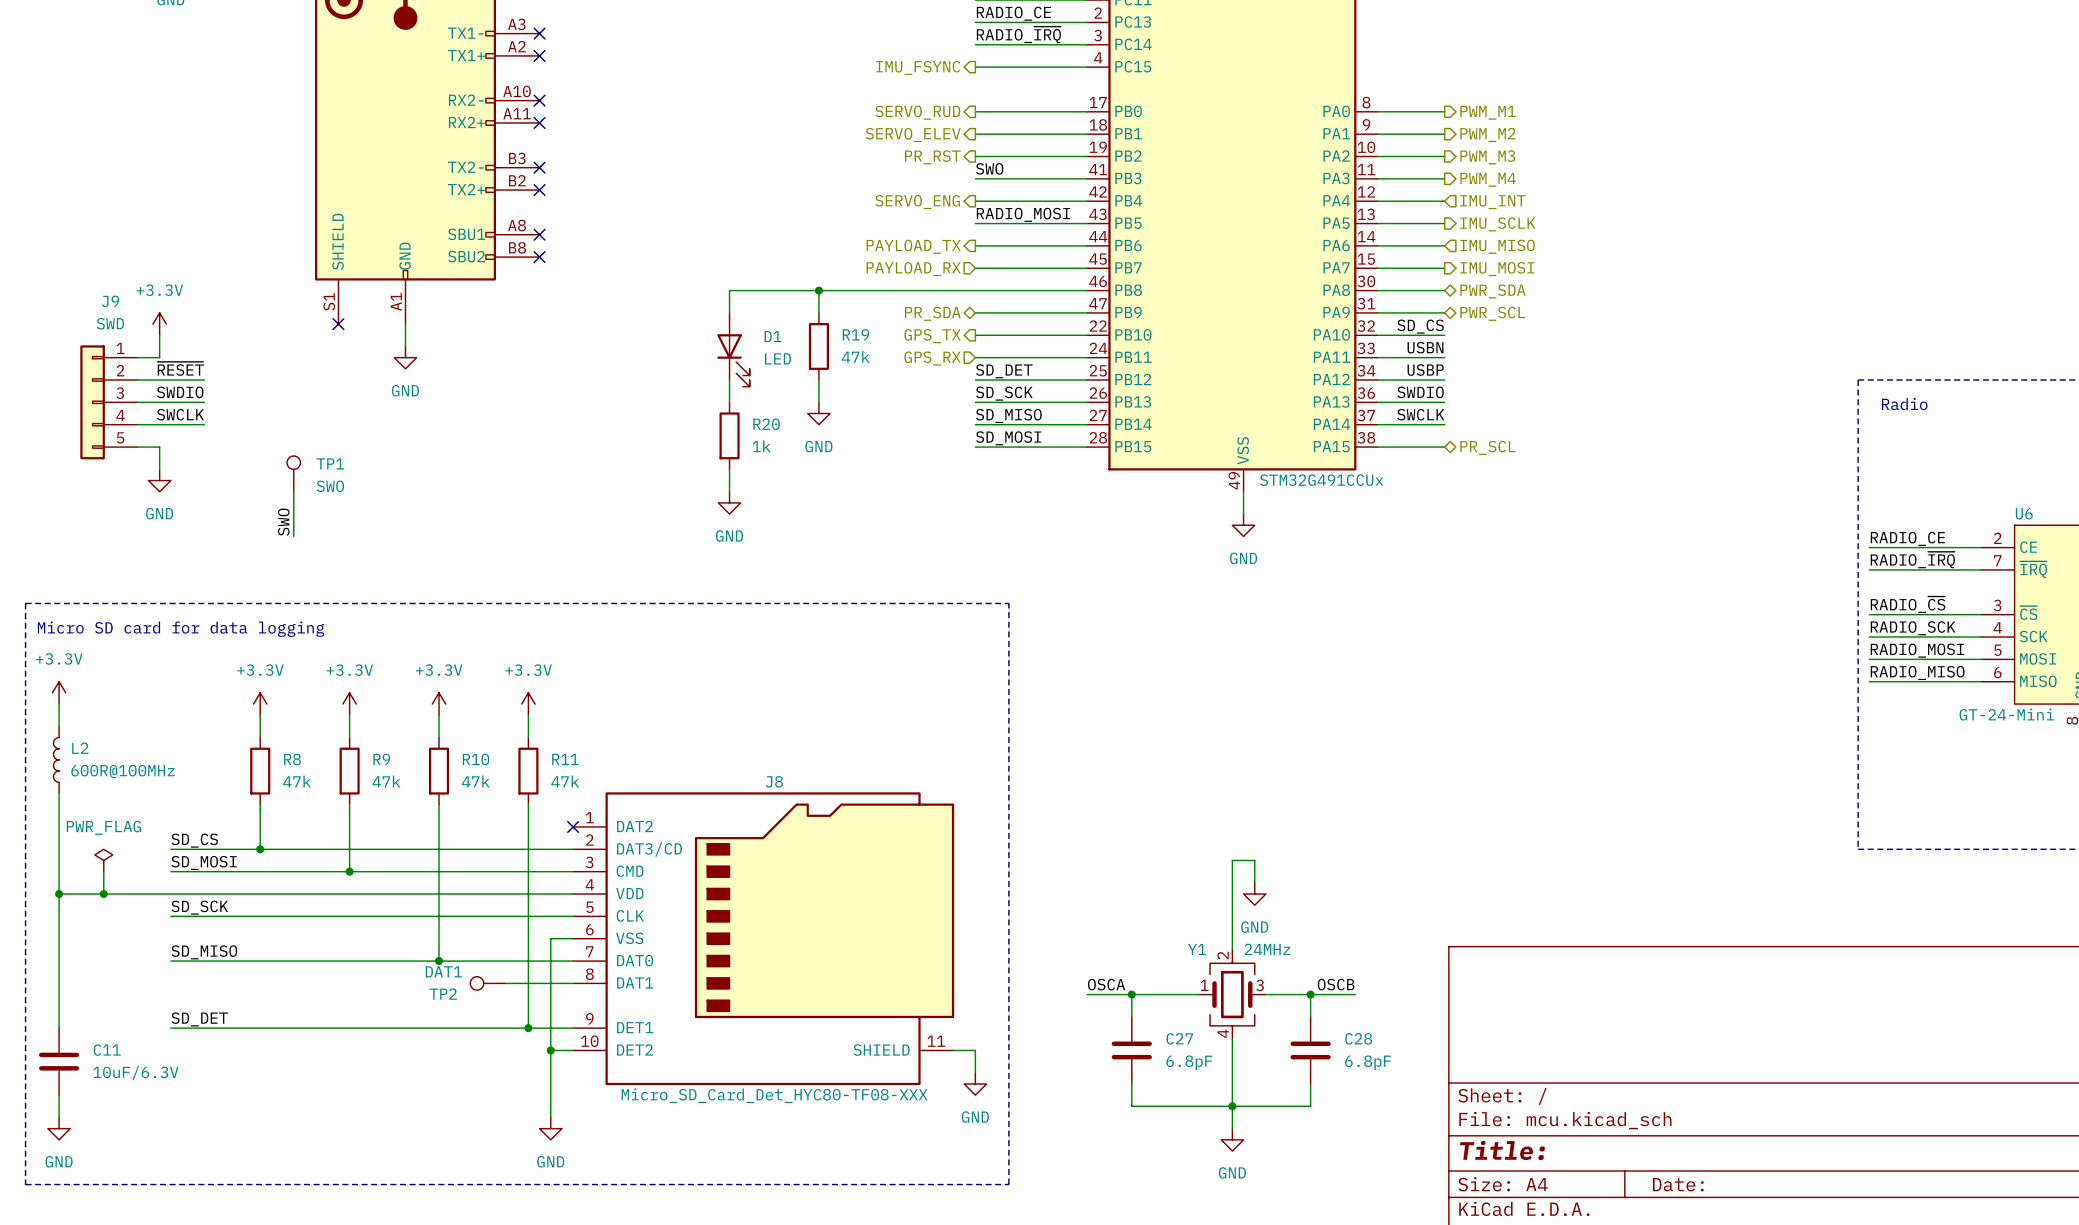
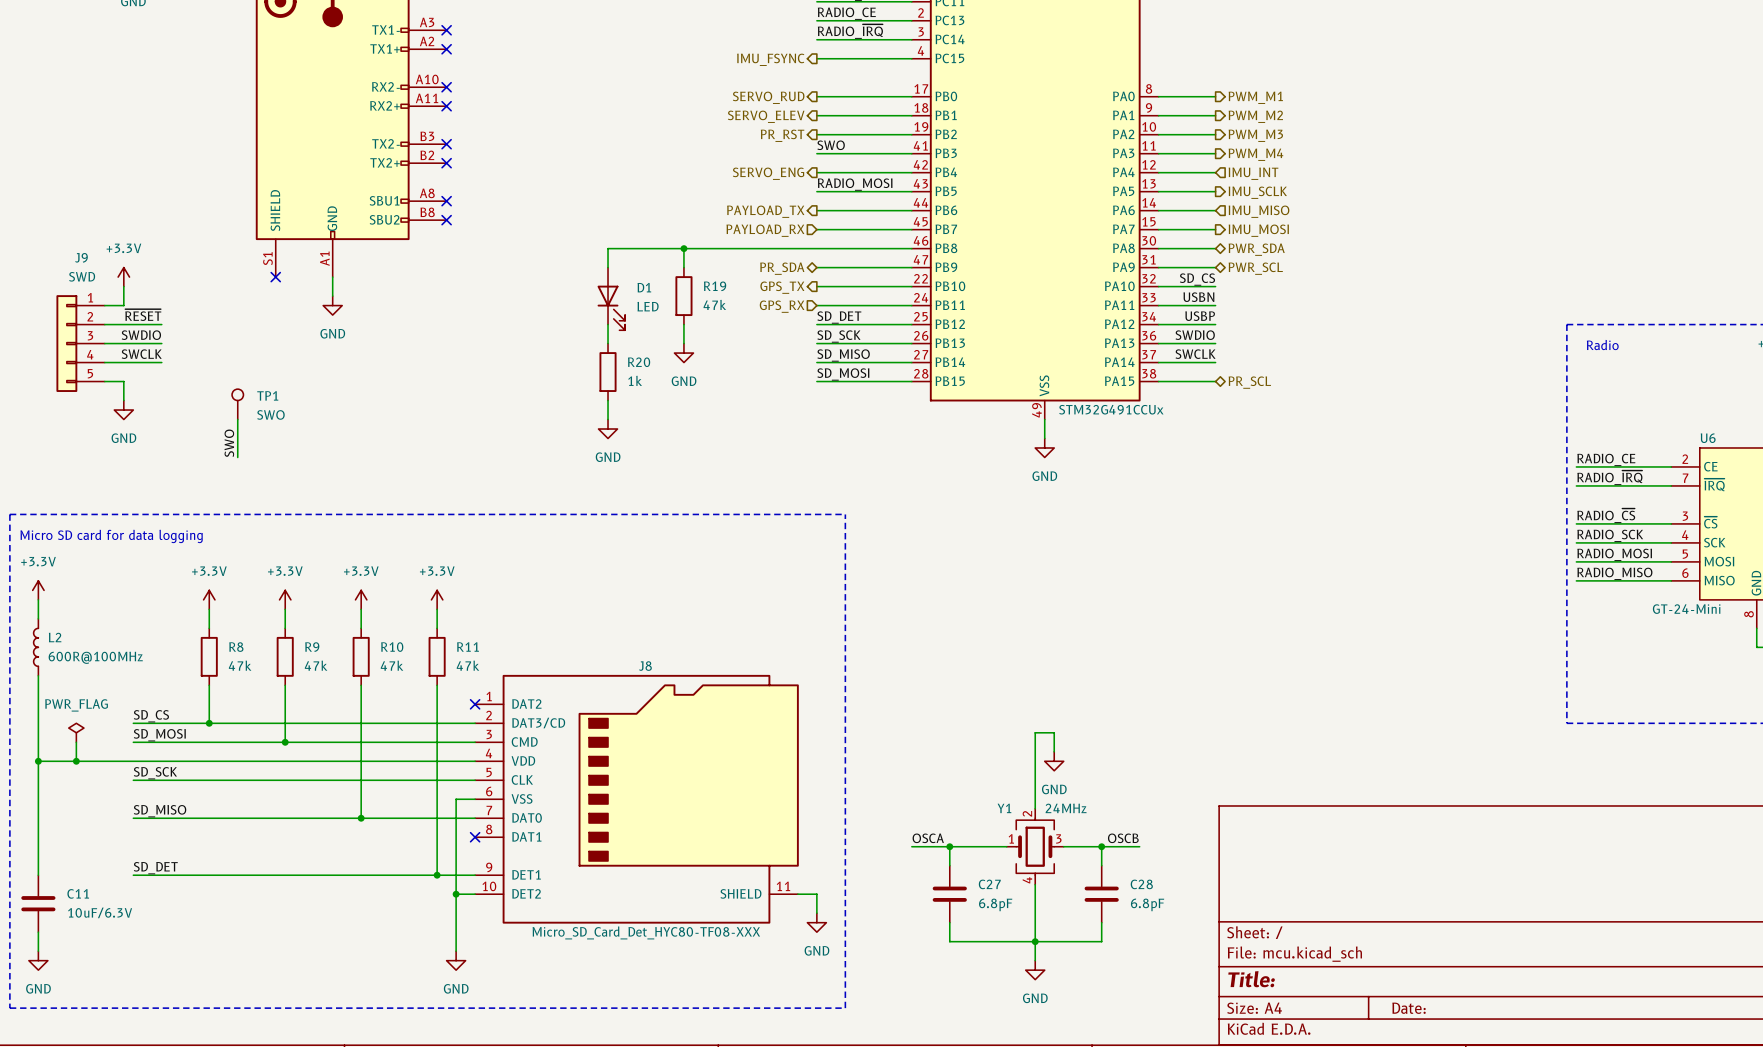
TP2: DAT1 (488, 983) -> none
wire: (506, 983) (573, 983) -> none
no-connect mark: none -> (475, 837)

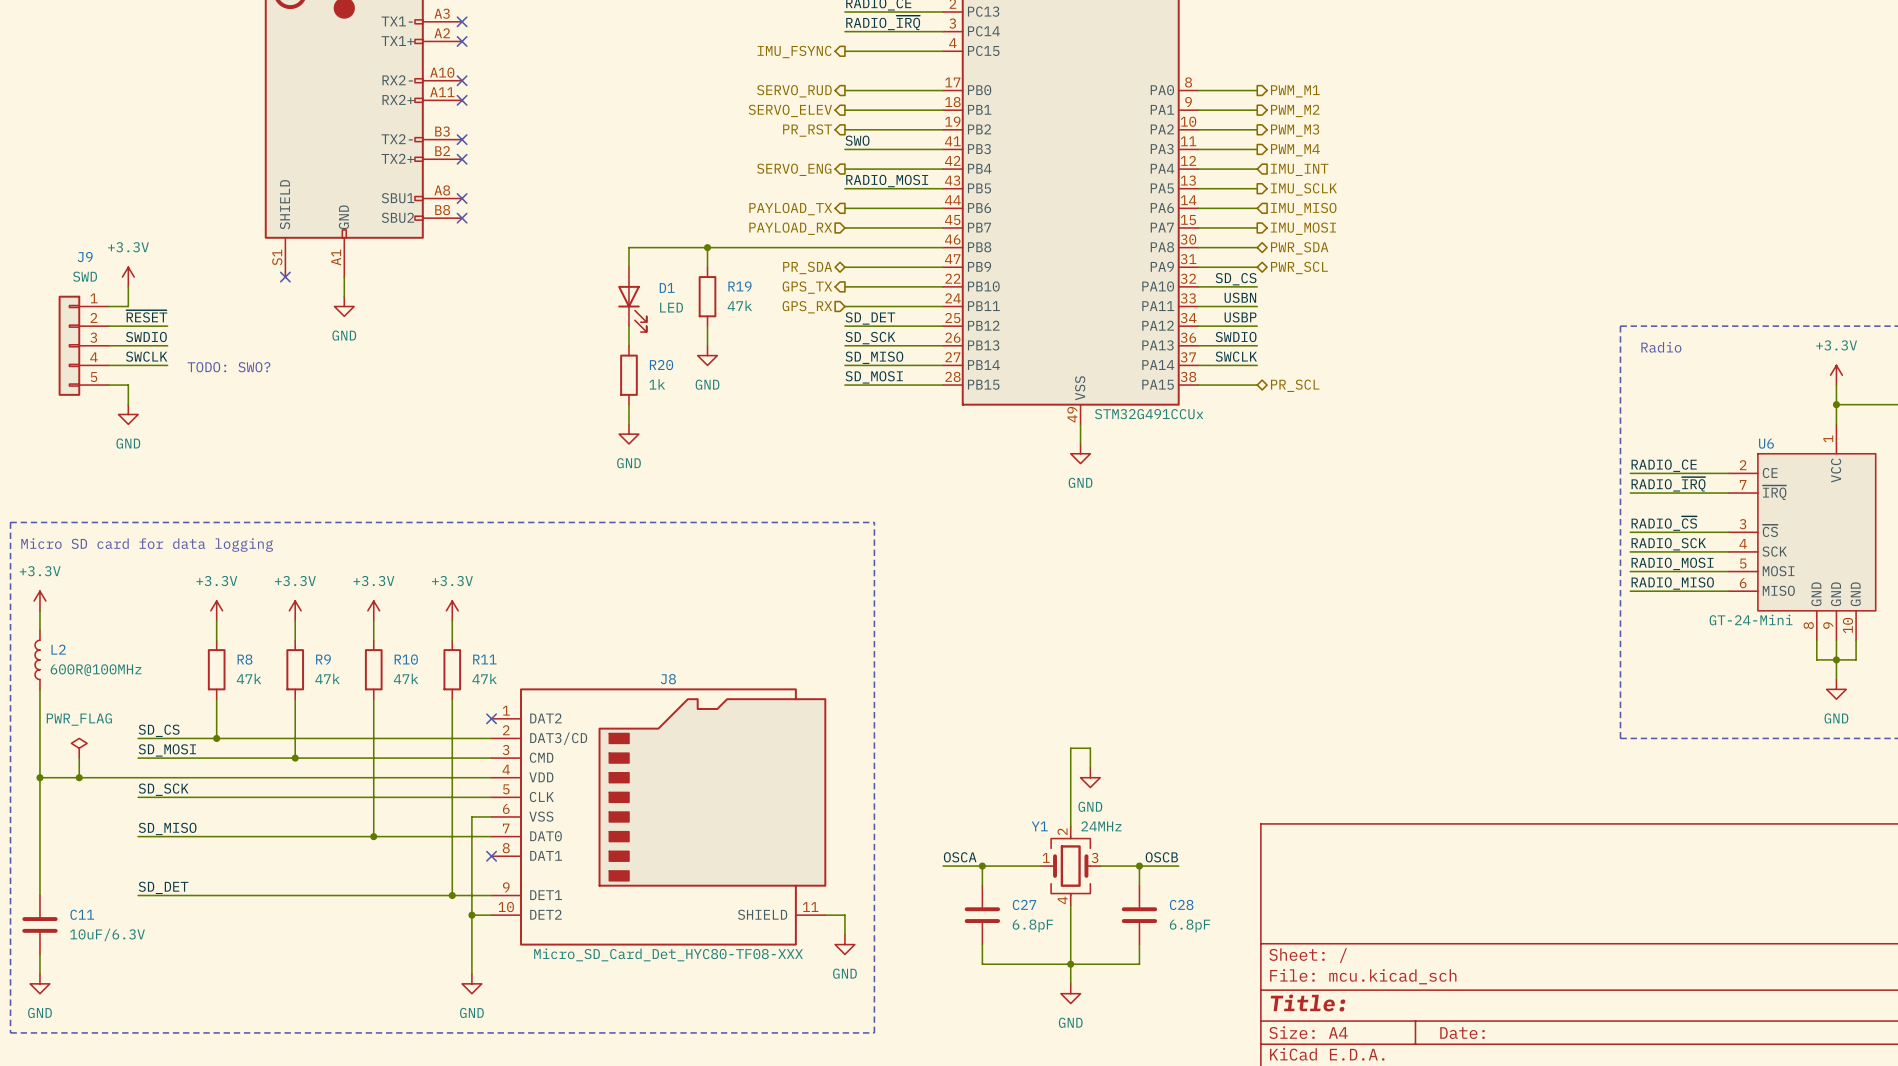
text: none -> TODO: SWO? (228, 367)
TP1: SWO (237, 404) -> none
wire: (237, 419) (237, 457) -> none
label: SWO (229, 443) -> none

